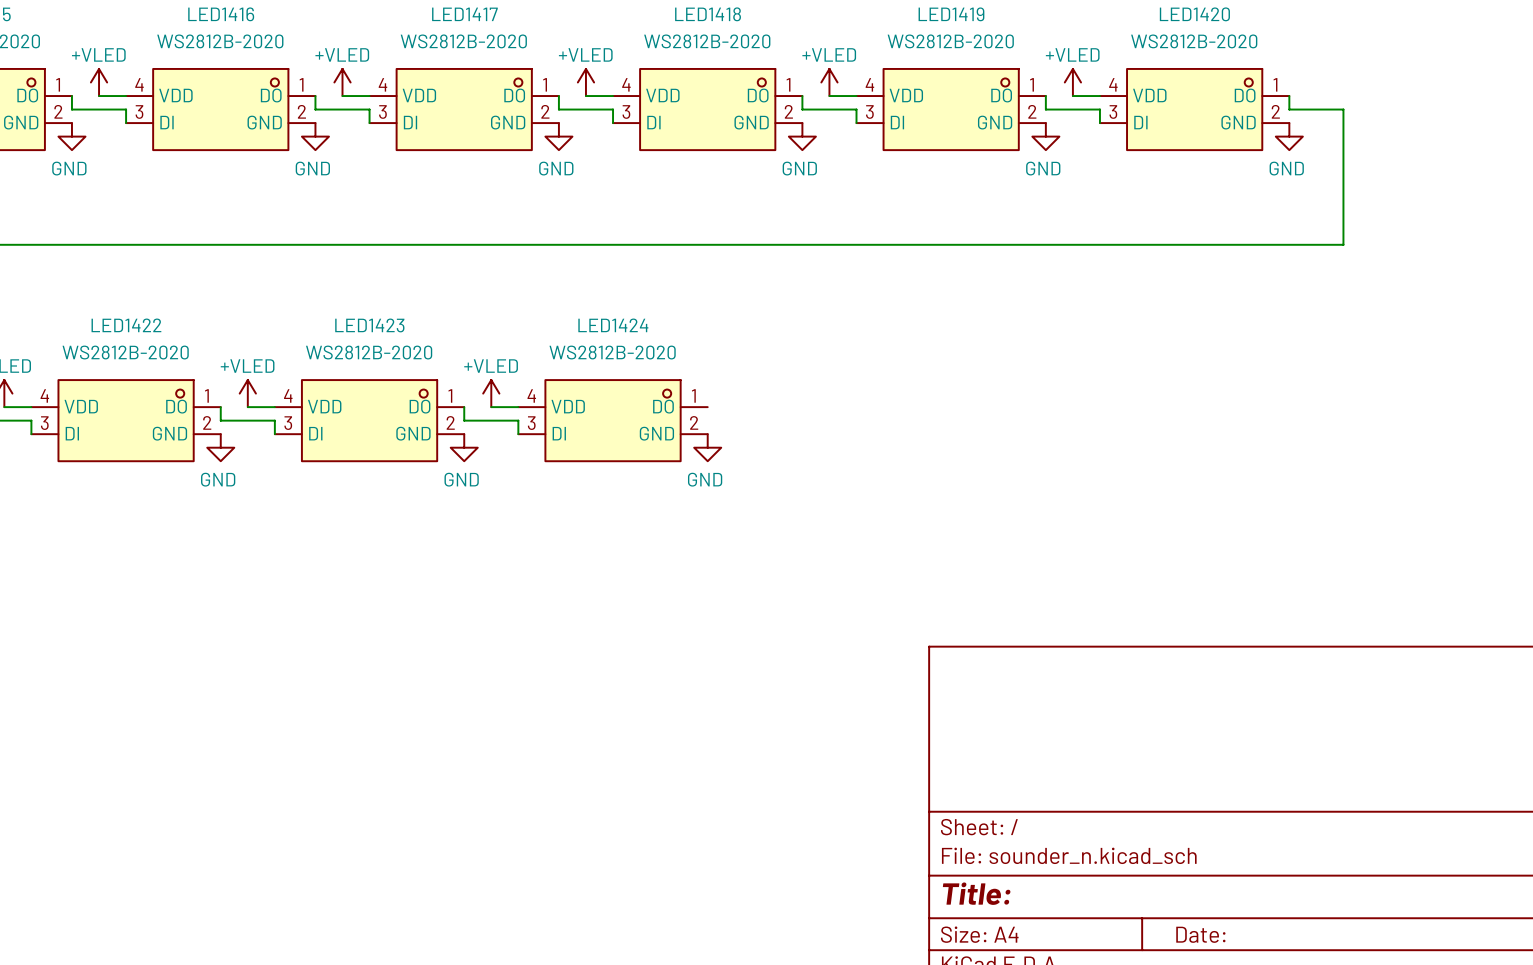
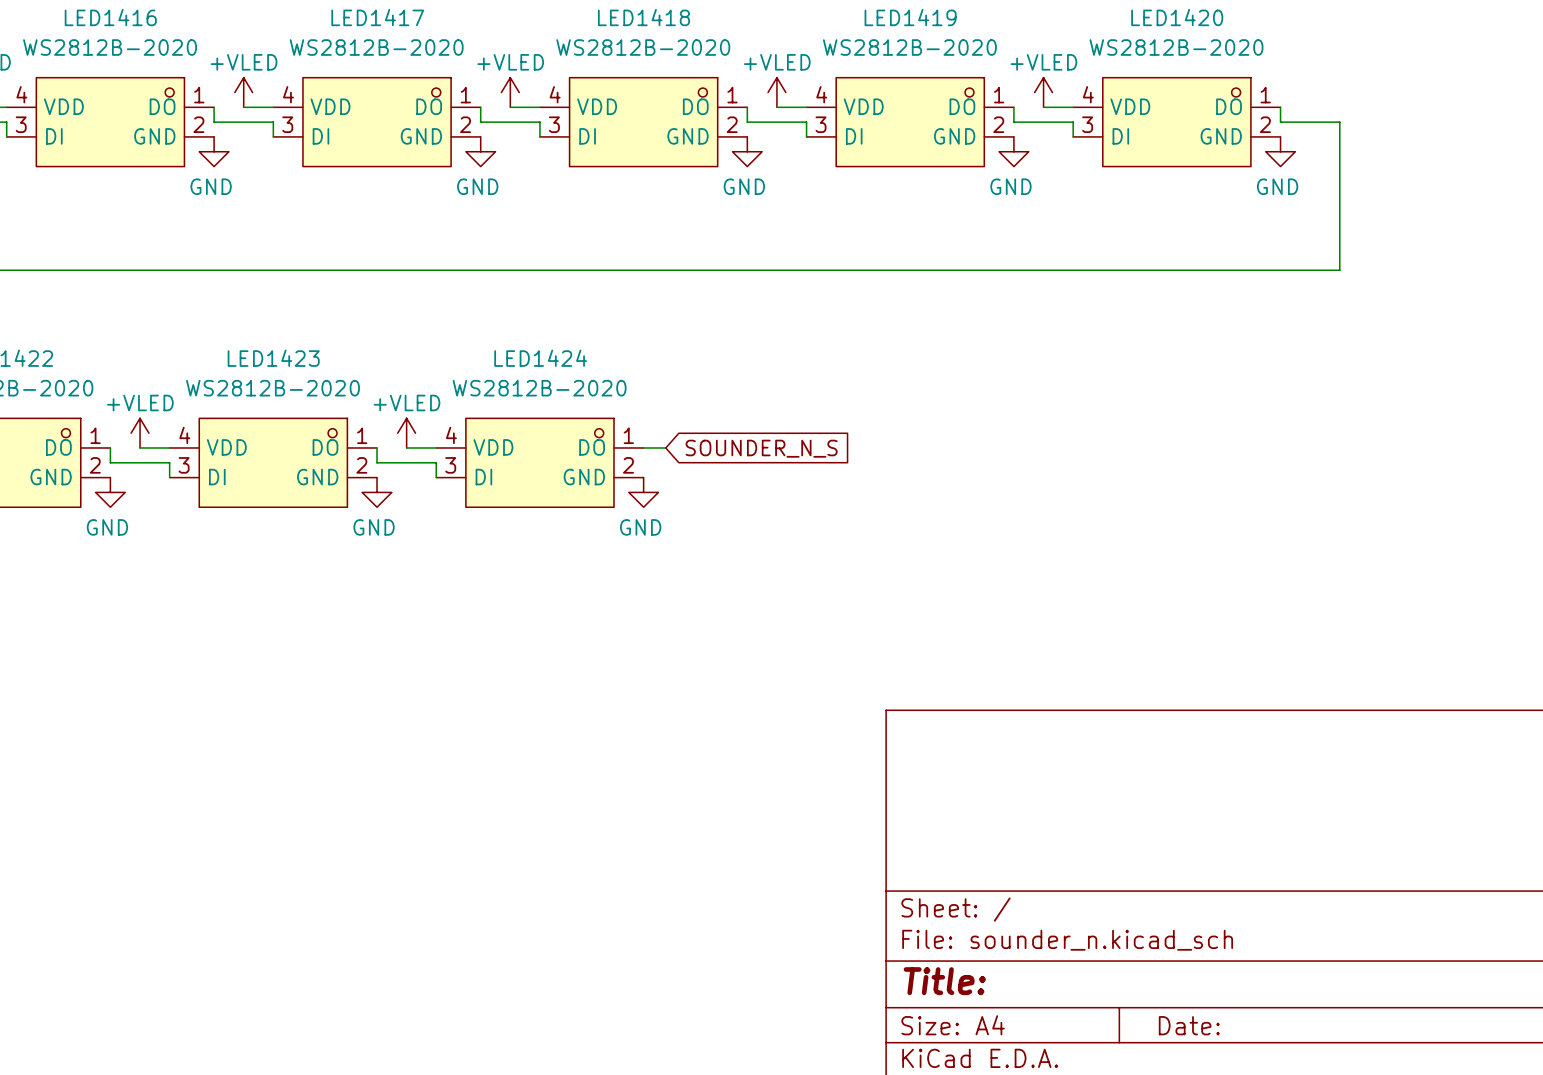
wire: none -> (643, 447) (665, 447)
global label: none -> SOUNDER_N_S (761, 448)

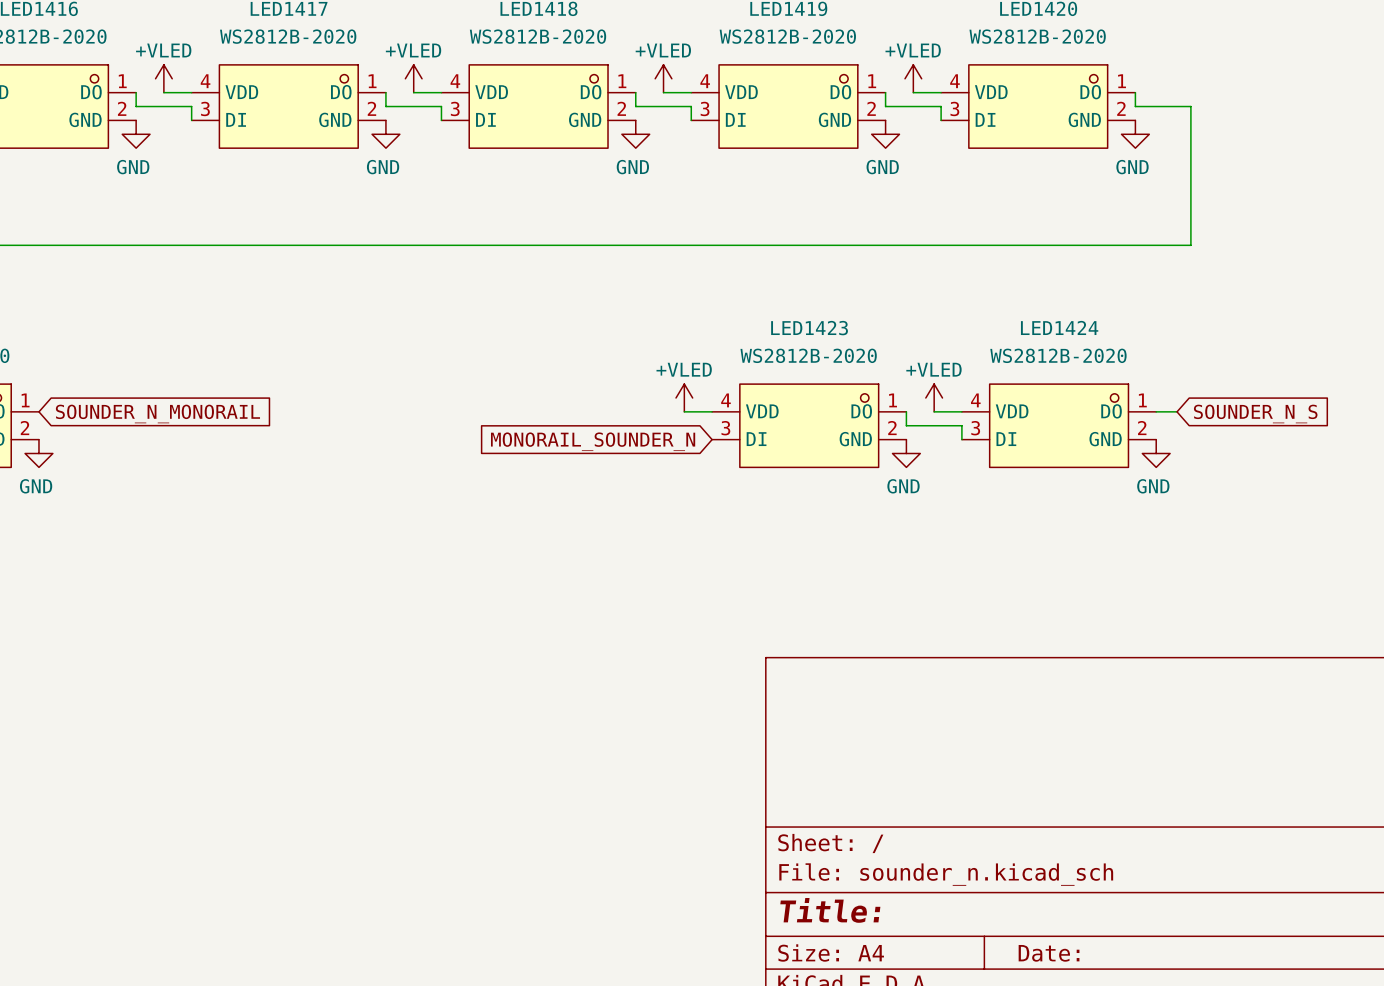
power symbol: +VLED (140, 433) -> none
power symbol: +VLED (406, 433) -> none
power symbol: none -> +VLED (684, 397)
power symbol: none -> +VLED (934, 397)
wire: (110, 447) (110, 462) (169, 462) (169, 477) -> none
wire: (140, 447) (169, 447) -> none
wire: (377, 447) (377, 462) (436, 462) (436, 477) -> none
wire: (406, 447) (436, 447) -> none
wire: (643, 447) (665, 447) -> none
wire: none -> (684, 411) (712, 411)
wire: none -> (906, 411) (906, 425) (961, 425) (961, 439)
wire: none -> (934, 411) (961, 411)
wire: none -> (1156, 411) (1177, 411)
global label: none -> SOUNDER_N_MONORAIL (157, 413)
global label: SOUNDER_N_S (761, 448) -> MONORAIL_SOUNDER_N (593, 441)
global label: none -> SOUNDER_N_S (1255, 413)
LED1423 position: (273, 462) -> (809, 425)
LED1424 position: (539, 462) -> (1059, 425)
power symbol: GND (377, 492) -> none
power symbol: GND (643, 492) -> none
power symbol: none -> GND (906, 453)
power symbol: none -> GND (1156, 453)

